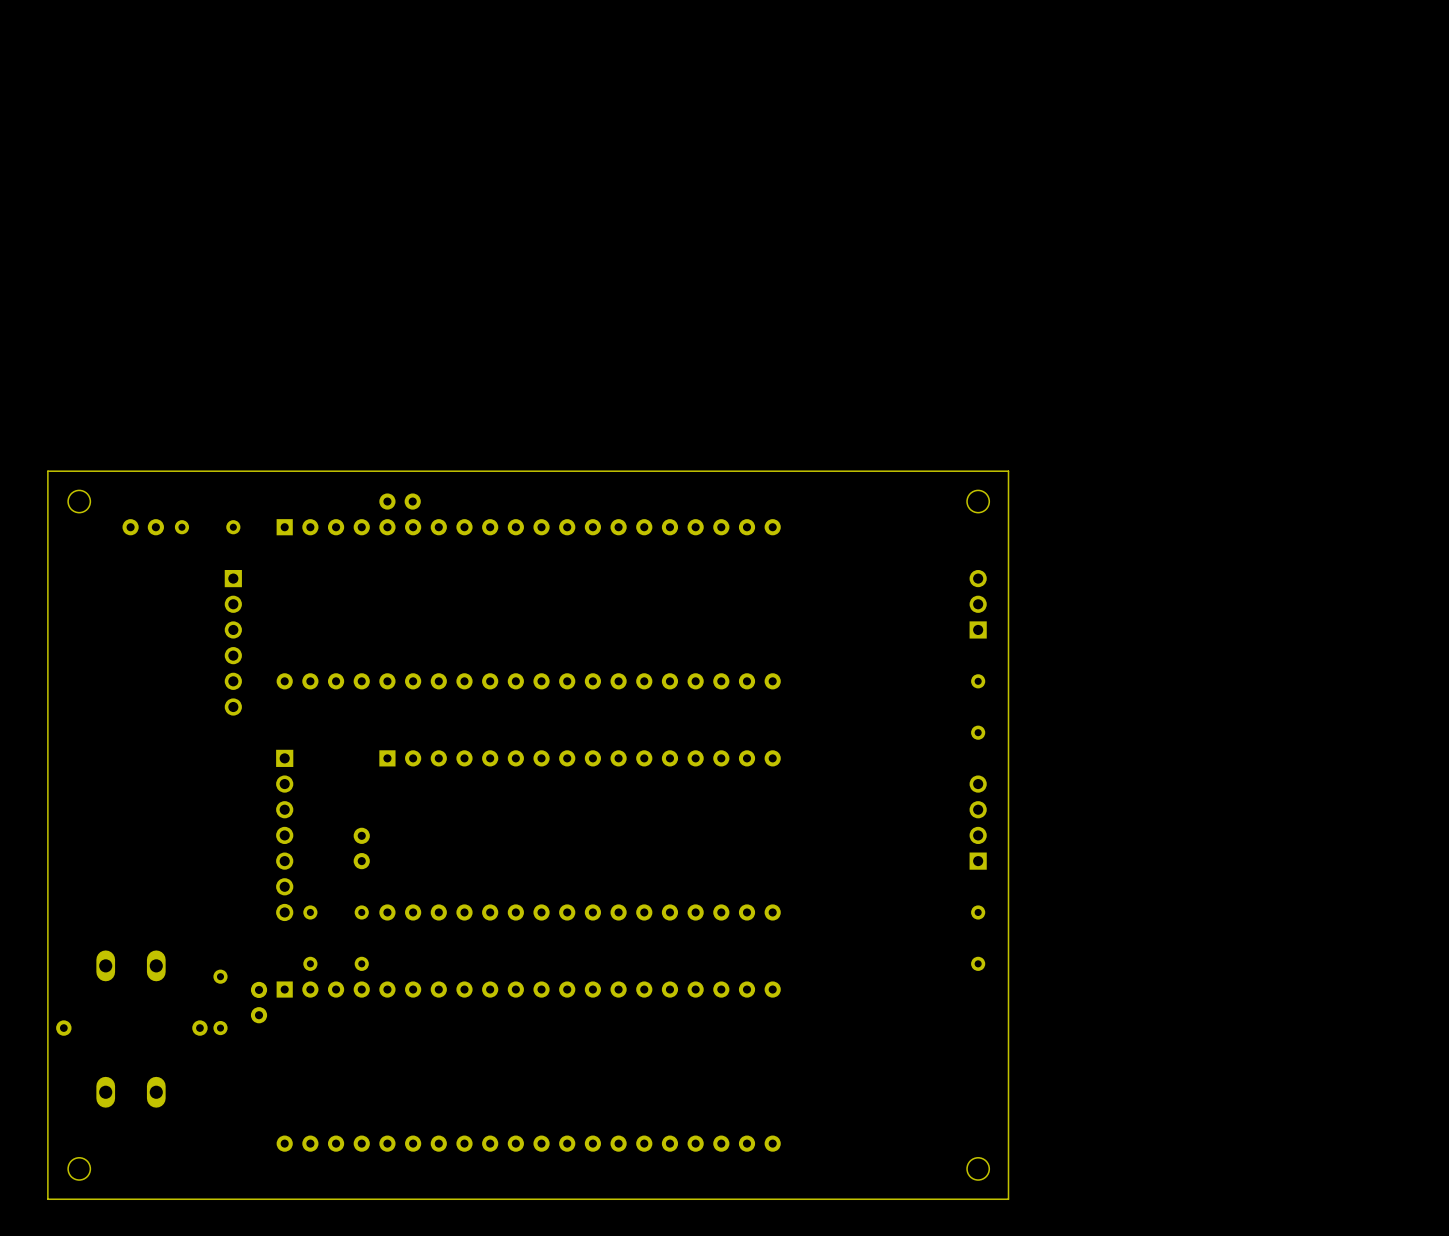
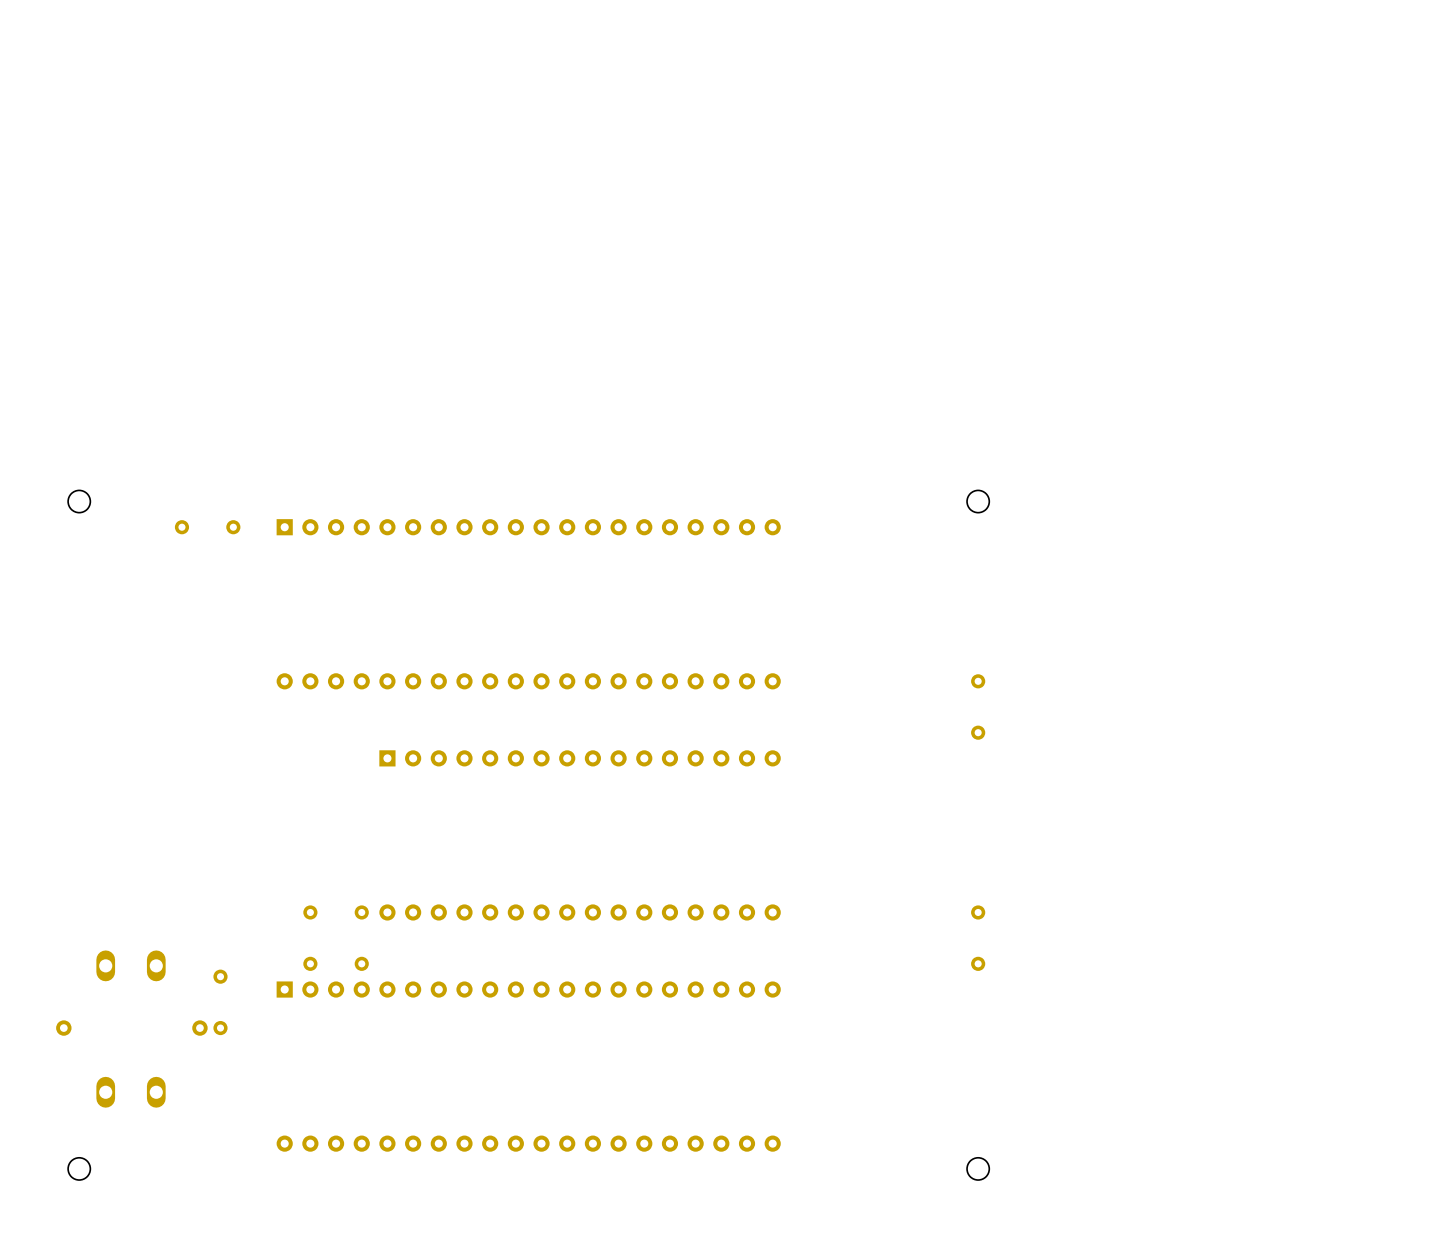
board edge: (1008, 471) (1008, 1199) (47, 1199) (47, 471) (1008, 471) -> none
part: (400, 501) -> none
part: (143, 527) -> none
part: (978, 604) -> none
part: (233, 642) -> none
part: (978, 822) -> none
part: (284, 835) -> none
part: (361, 848) -> none
part: (259, 1002) -> none

